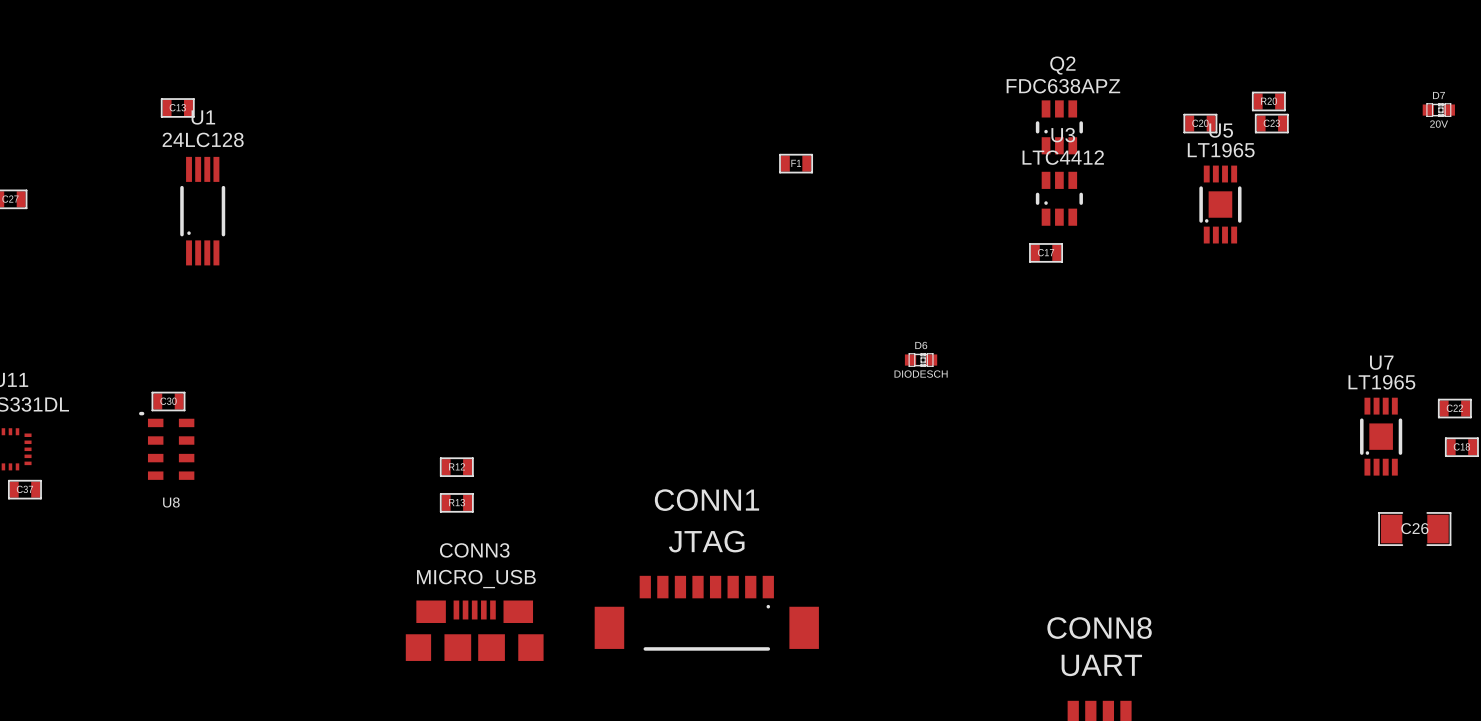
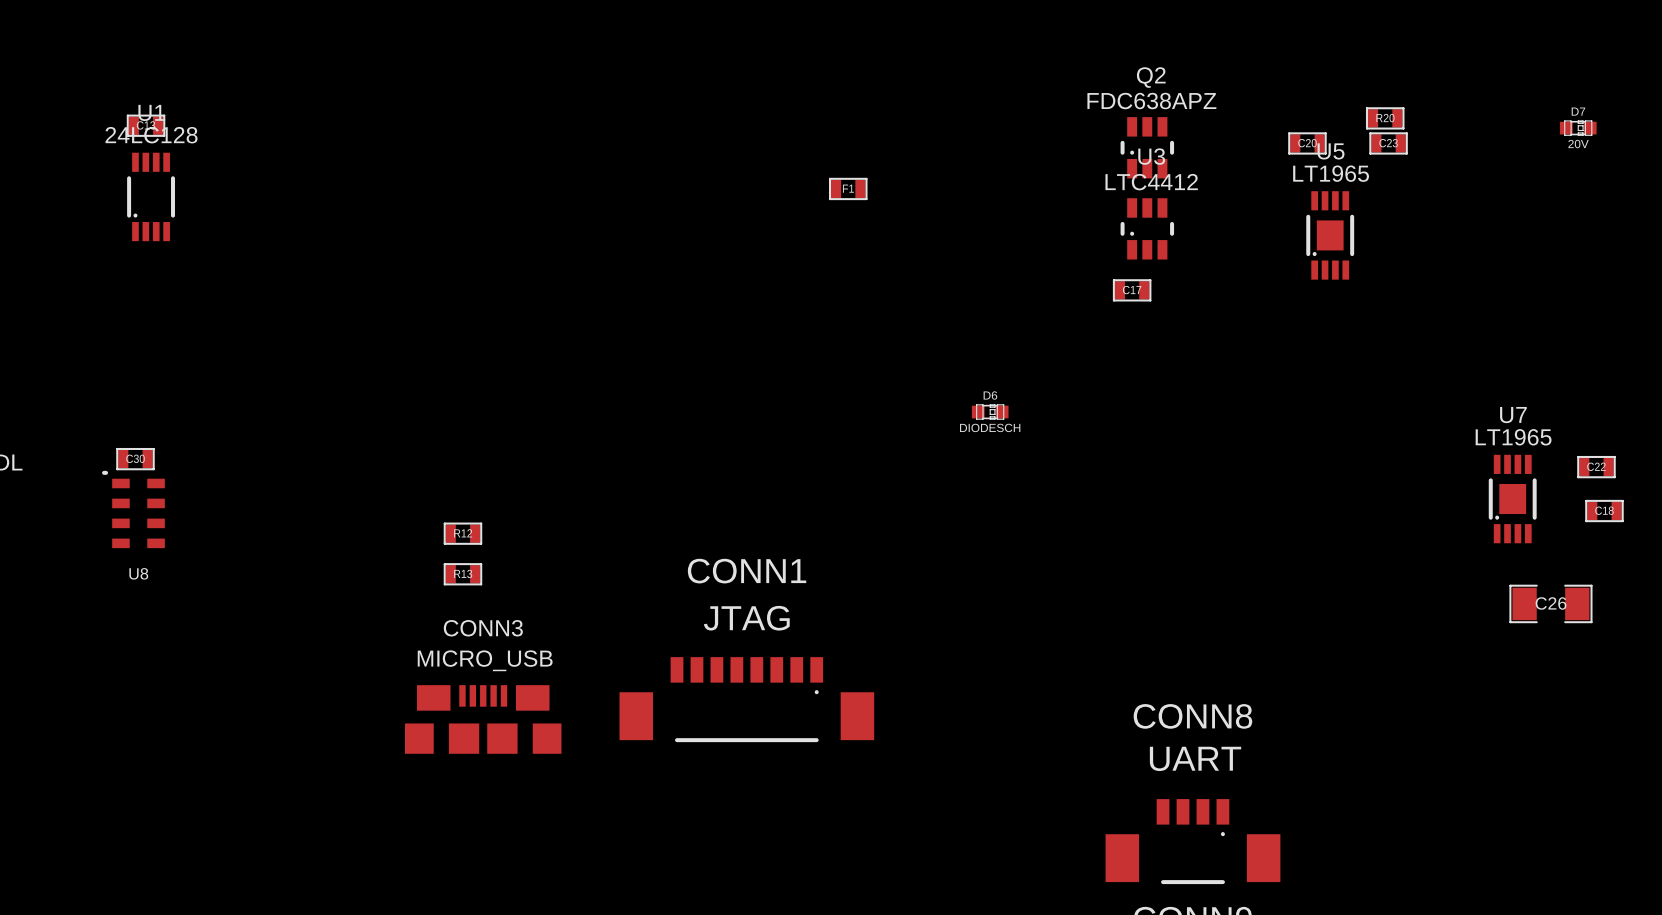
U1 footprint: [180, 156, 226, 266] -> [127, 152, 175, 242]

